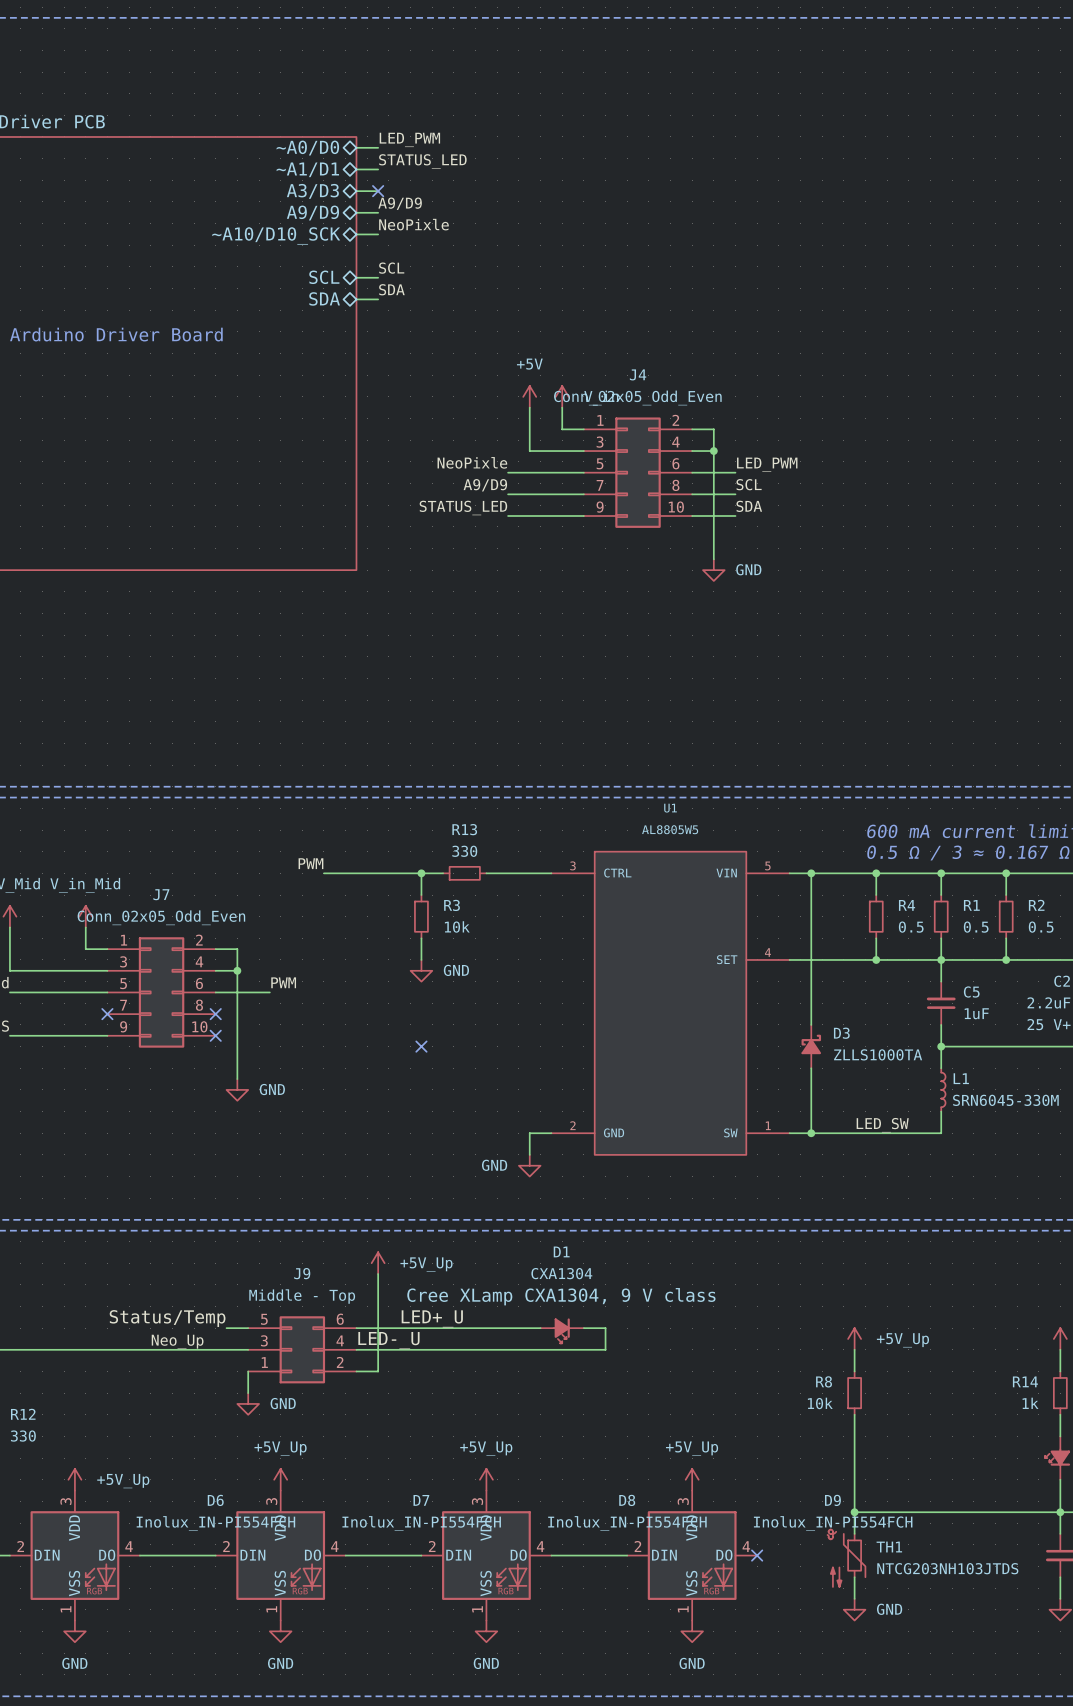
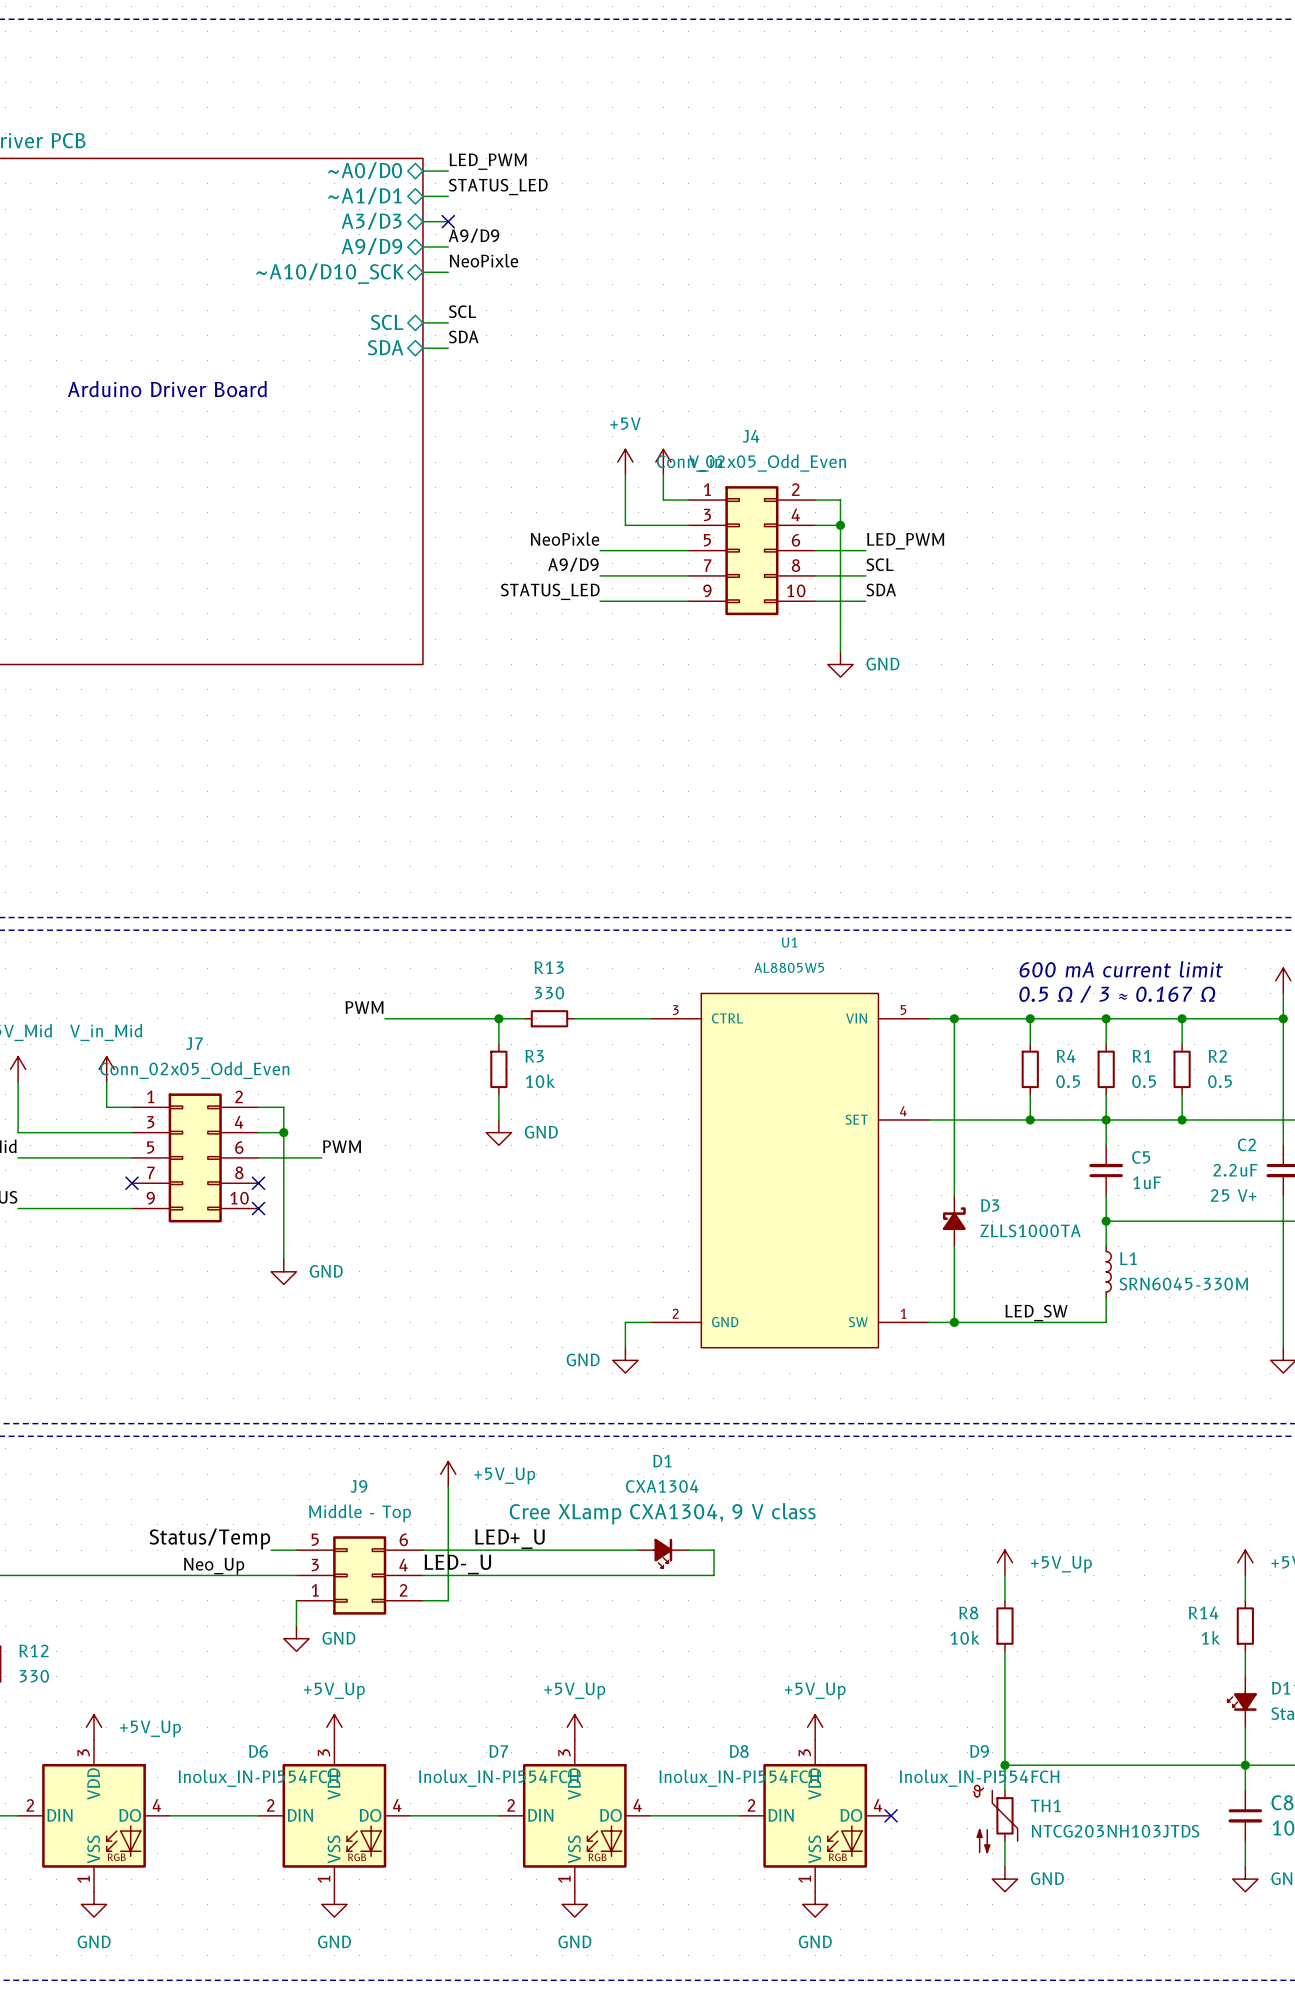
no-connect mark: (421, 1046) -> none

